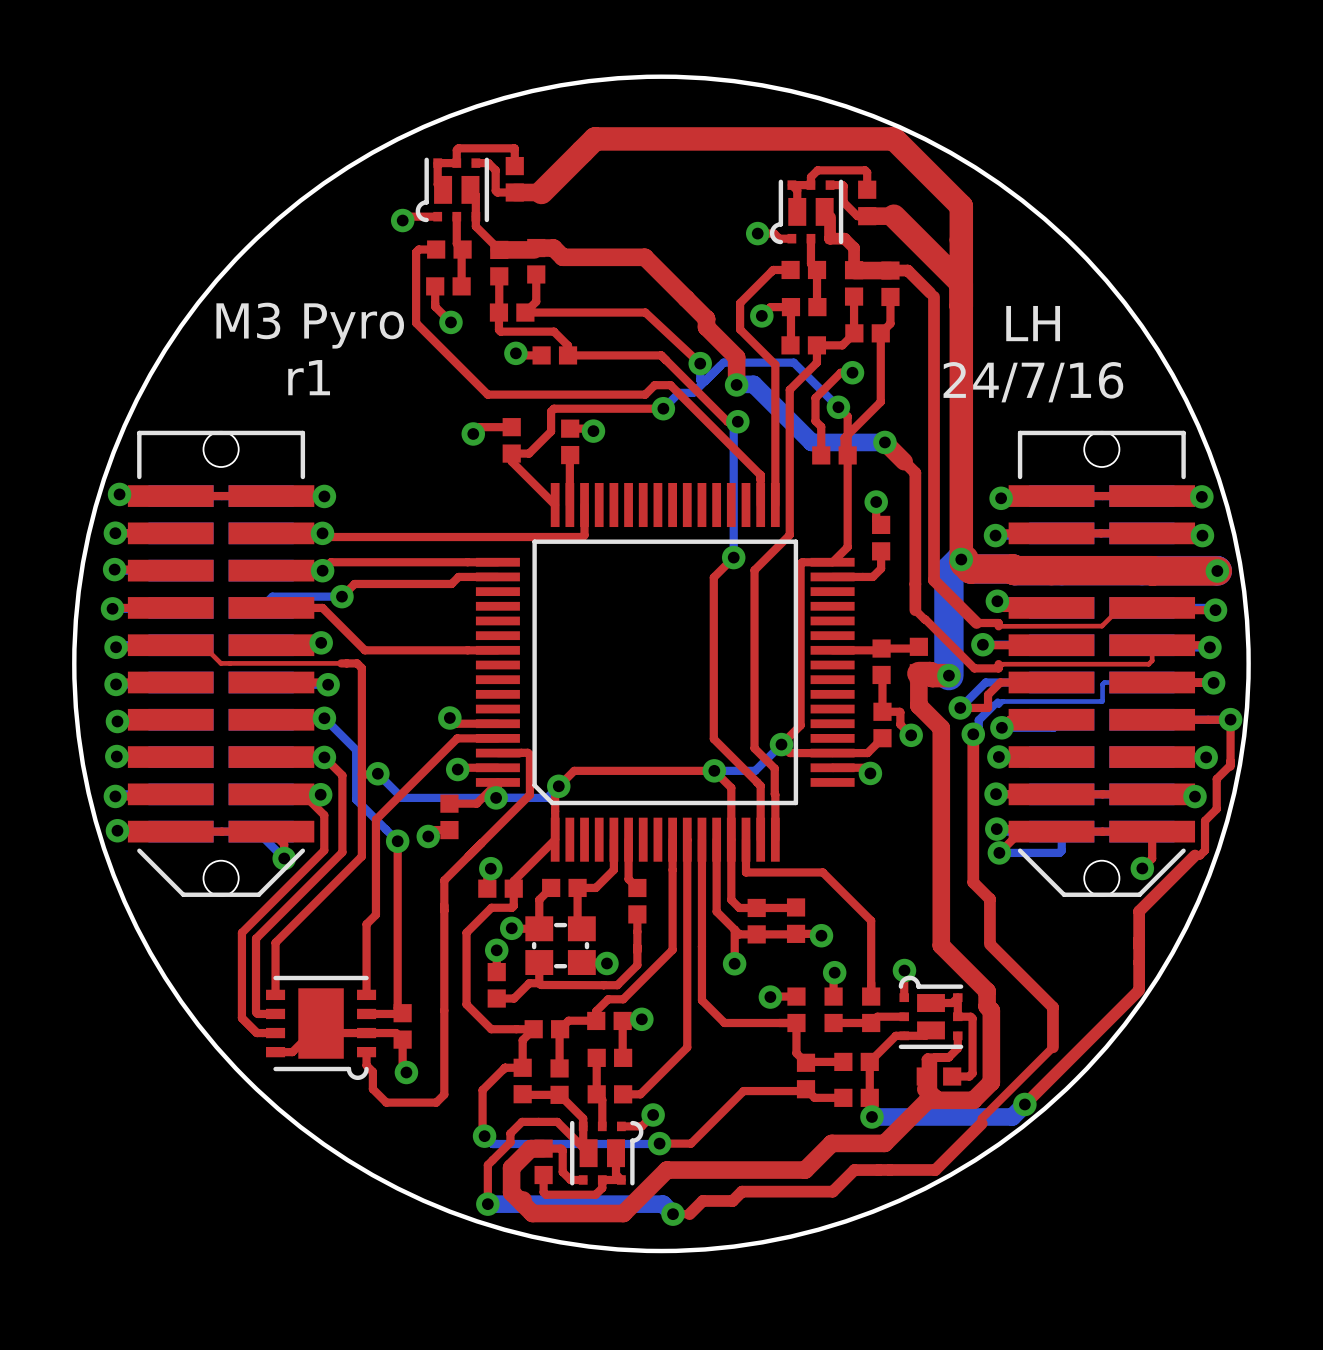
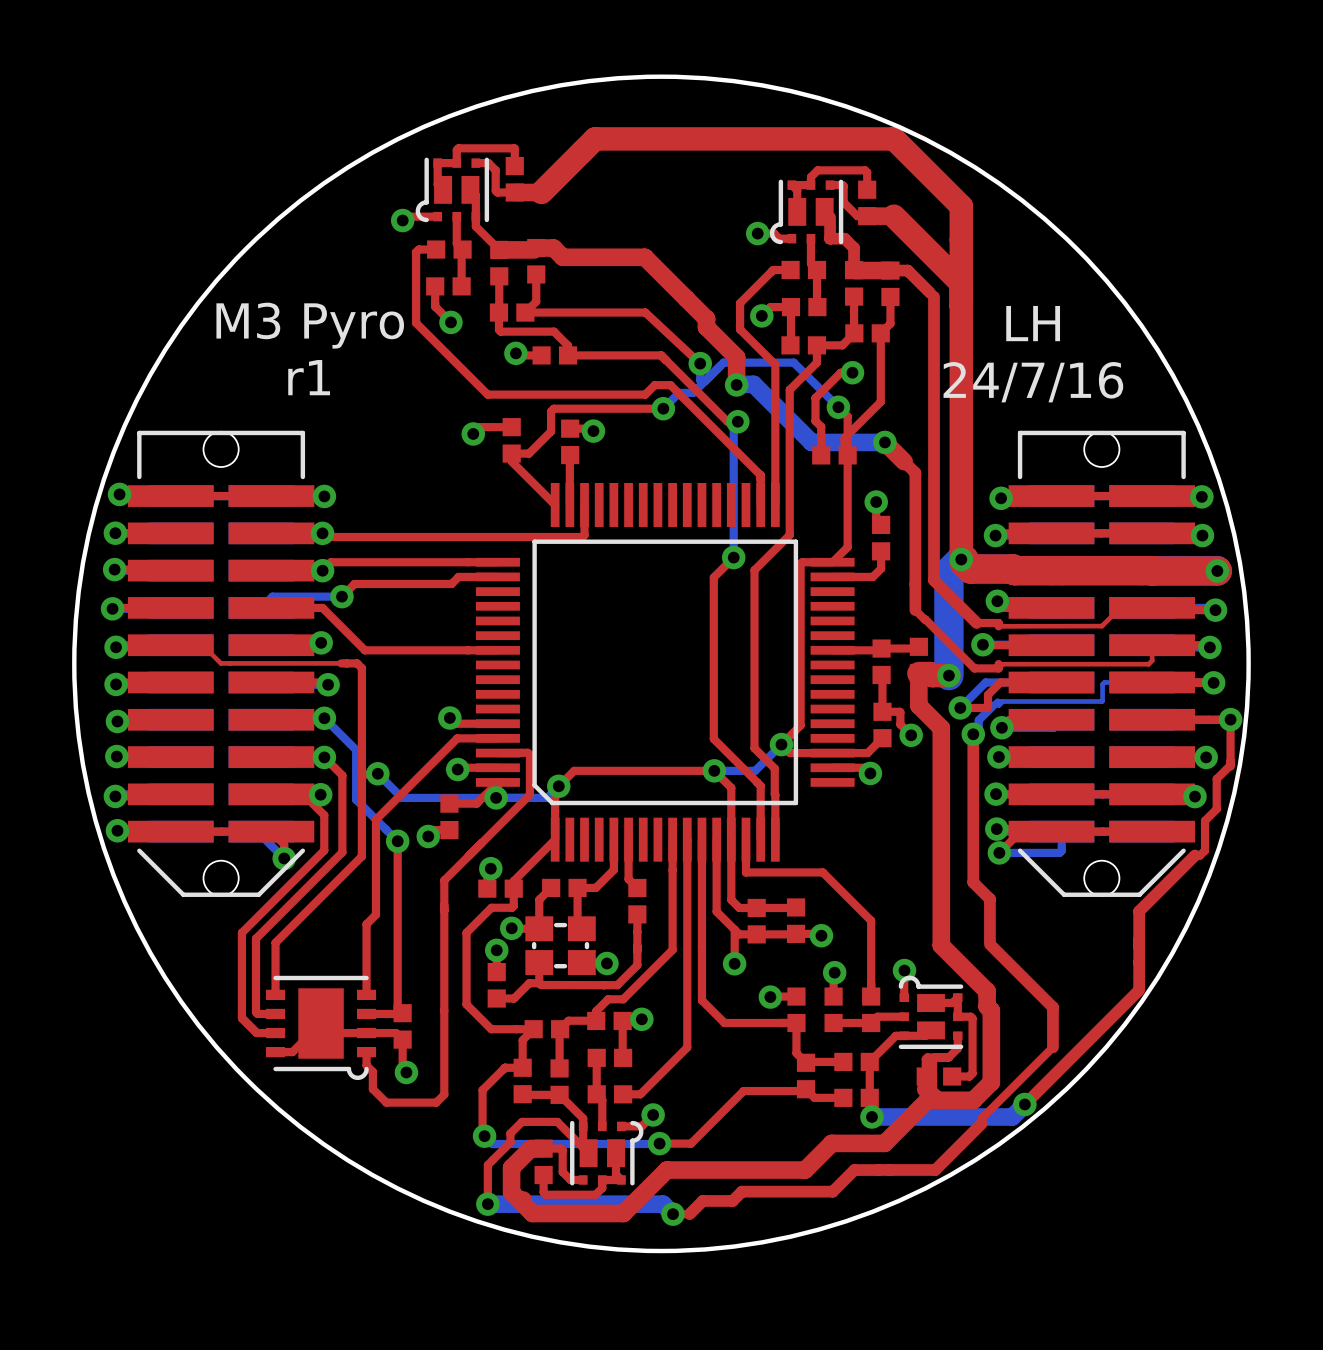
top track: (1152, 831) (1152, 858) (1142, 868) -> none
via: (1142, 868) -> none

